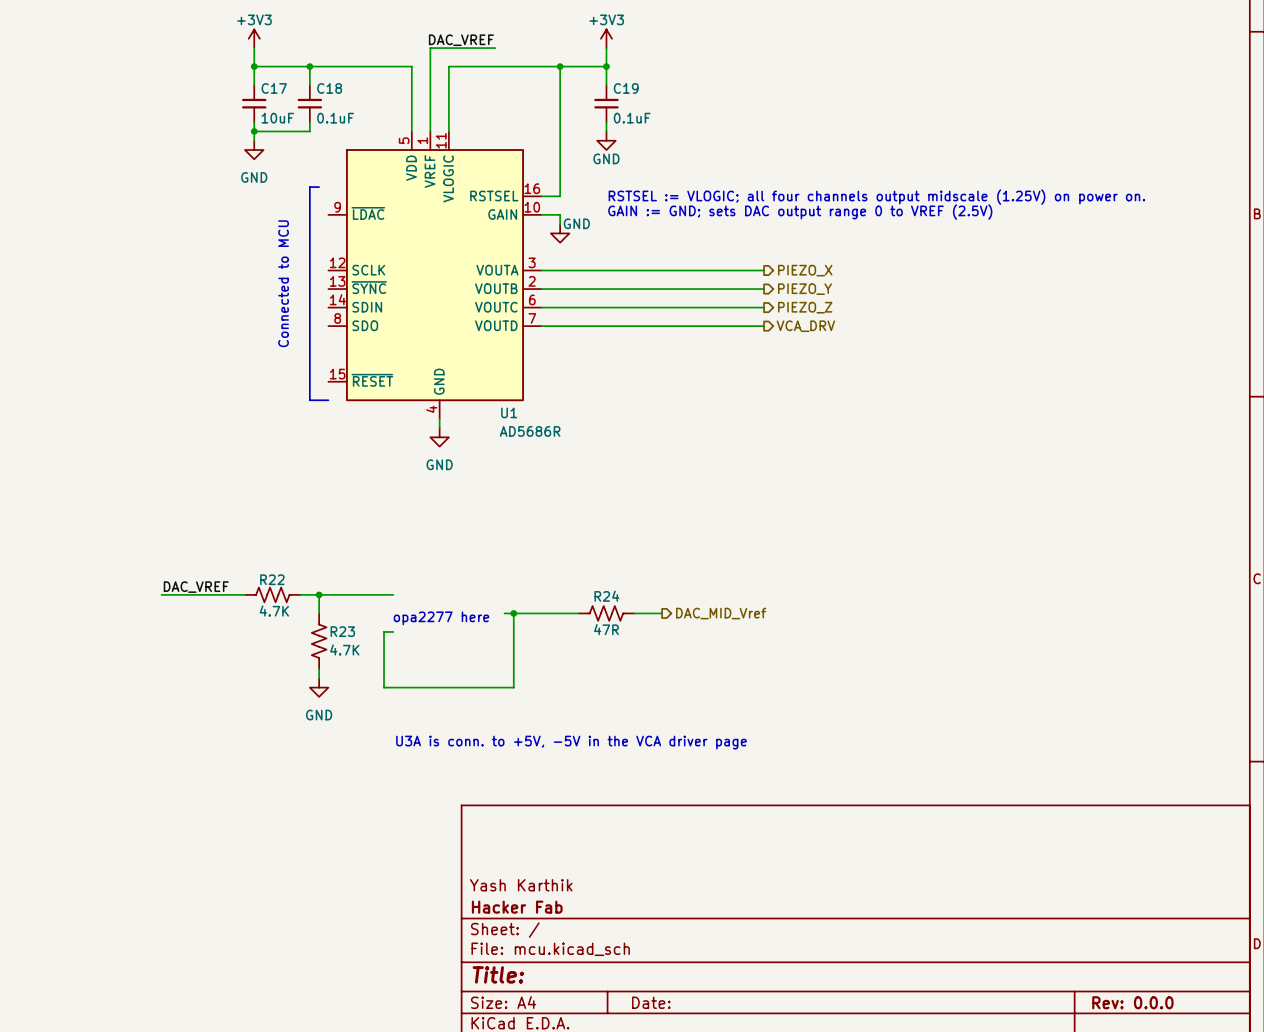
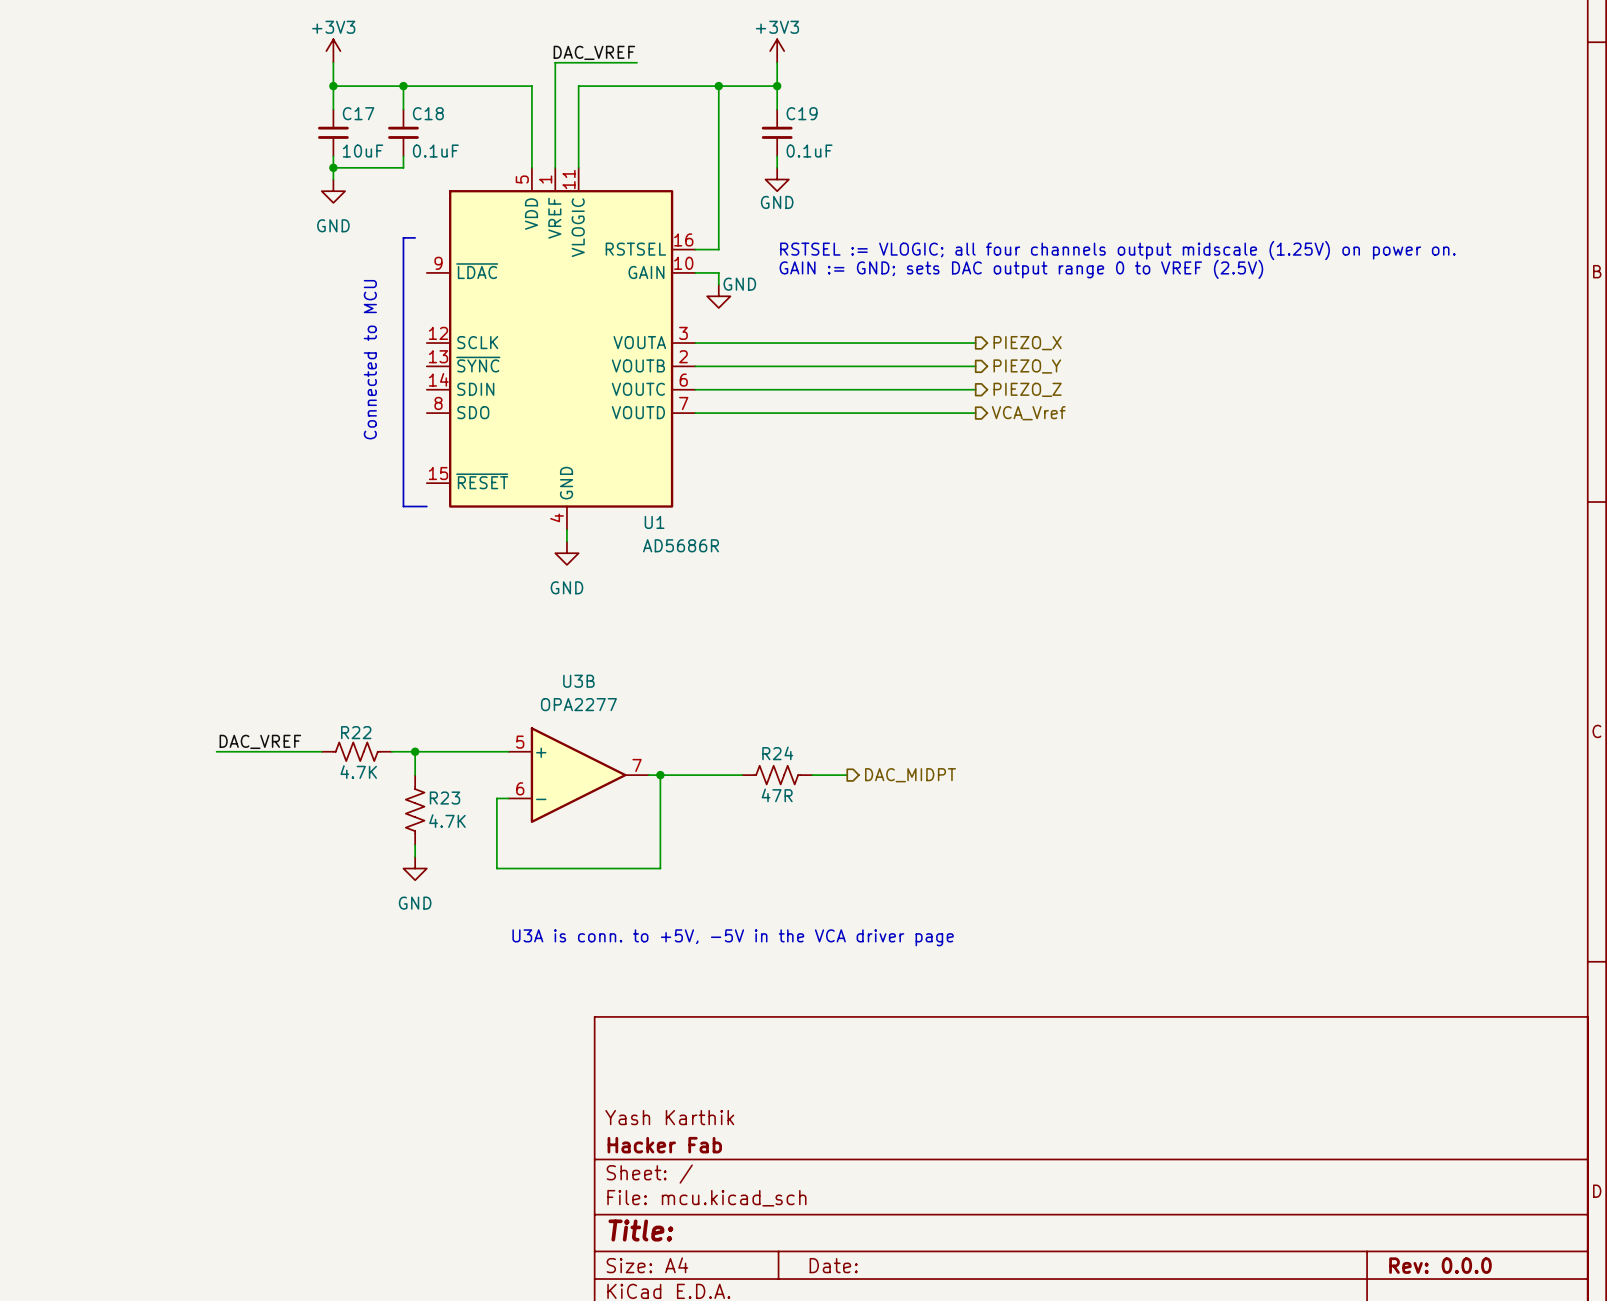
hierarchical label: VCA_DRV (805, 326) -> VCA_Vref (1028, 413)
U3B: none -> OPA2277 (578, 775)
hierarchical label: DAC_MID_Vref (721, 613) -> DAC_MIDPT (910, 775)
text: opa2277 here (441, 618) -> none

